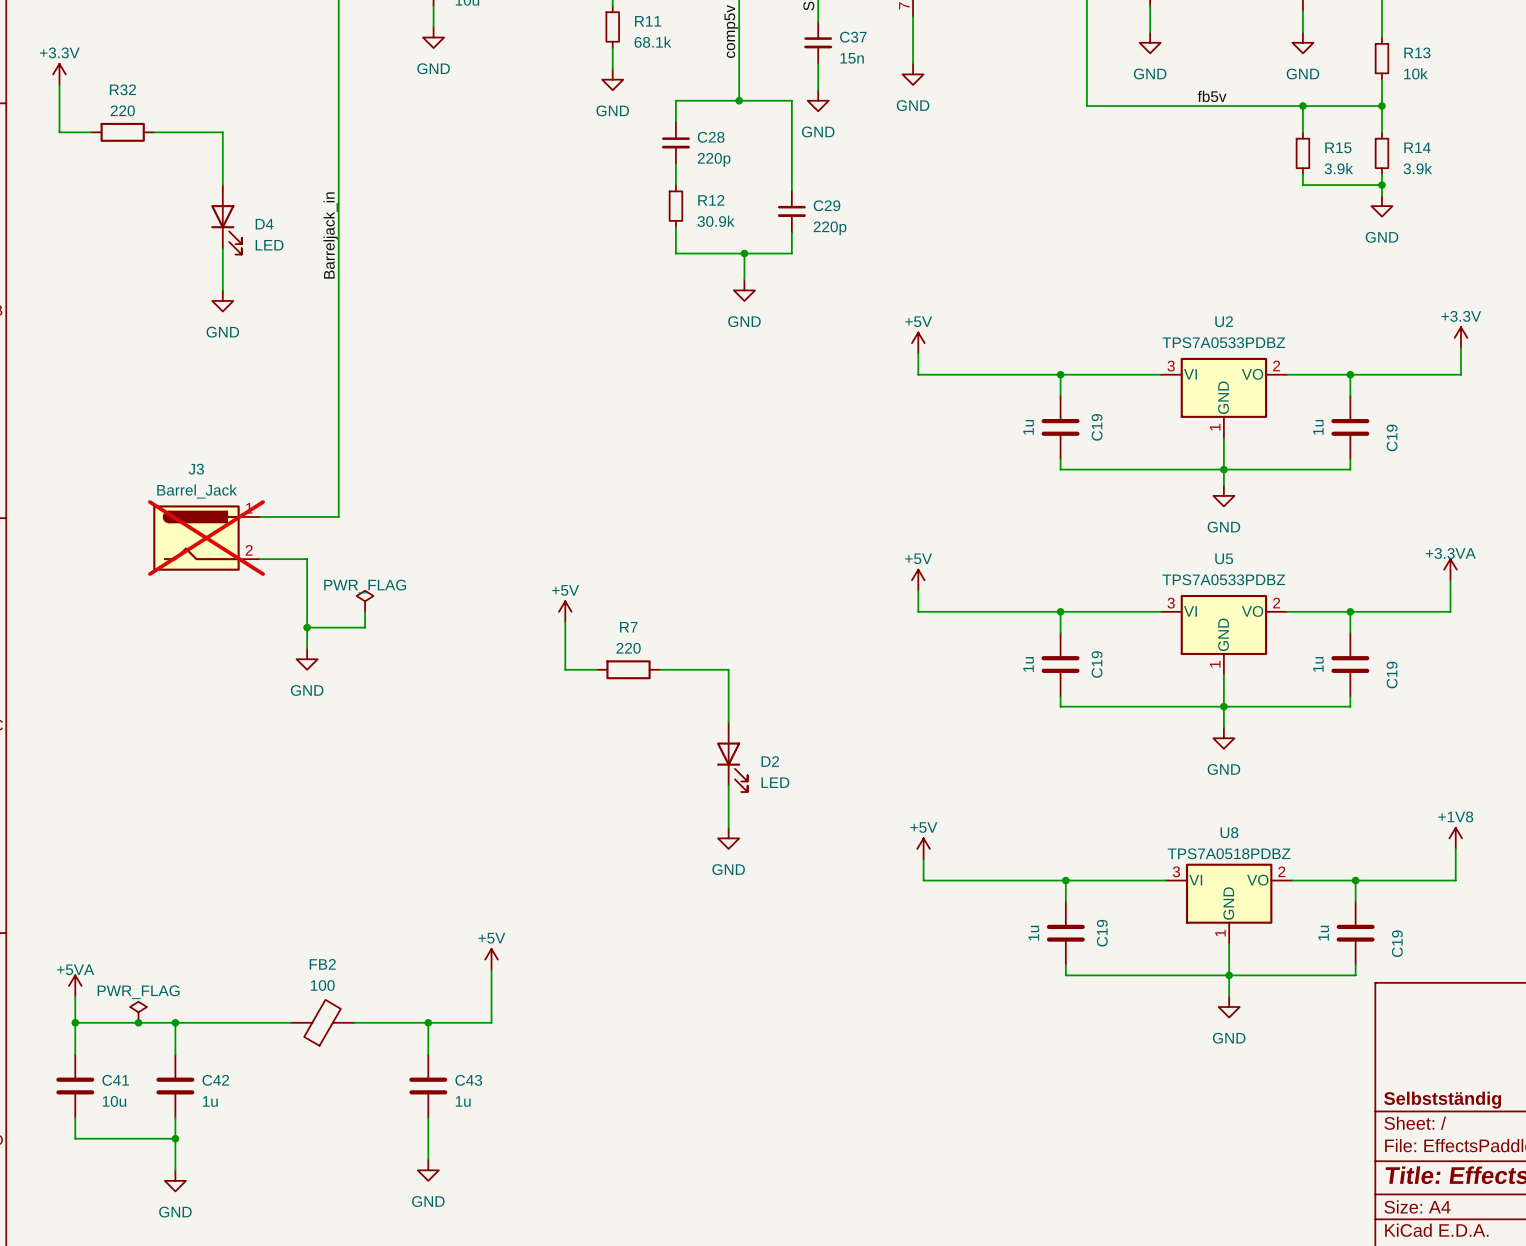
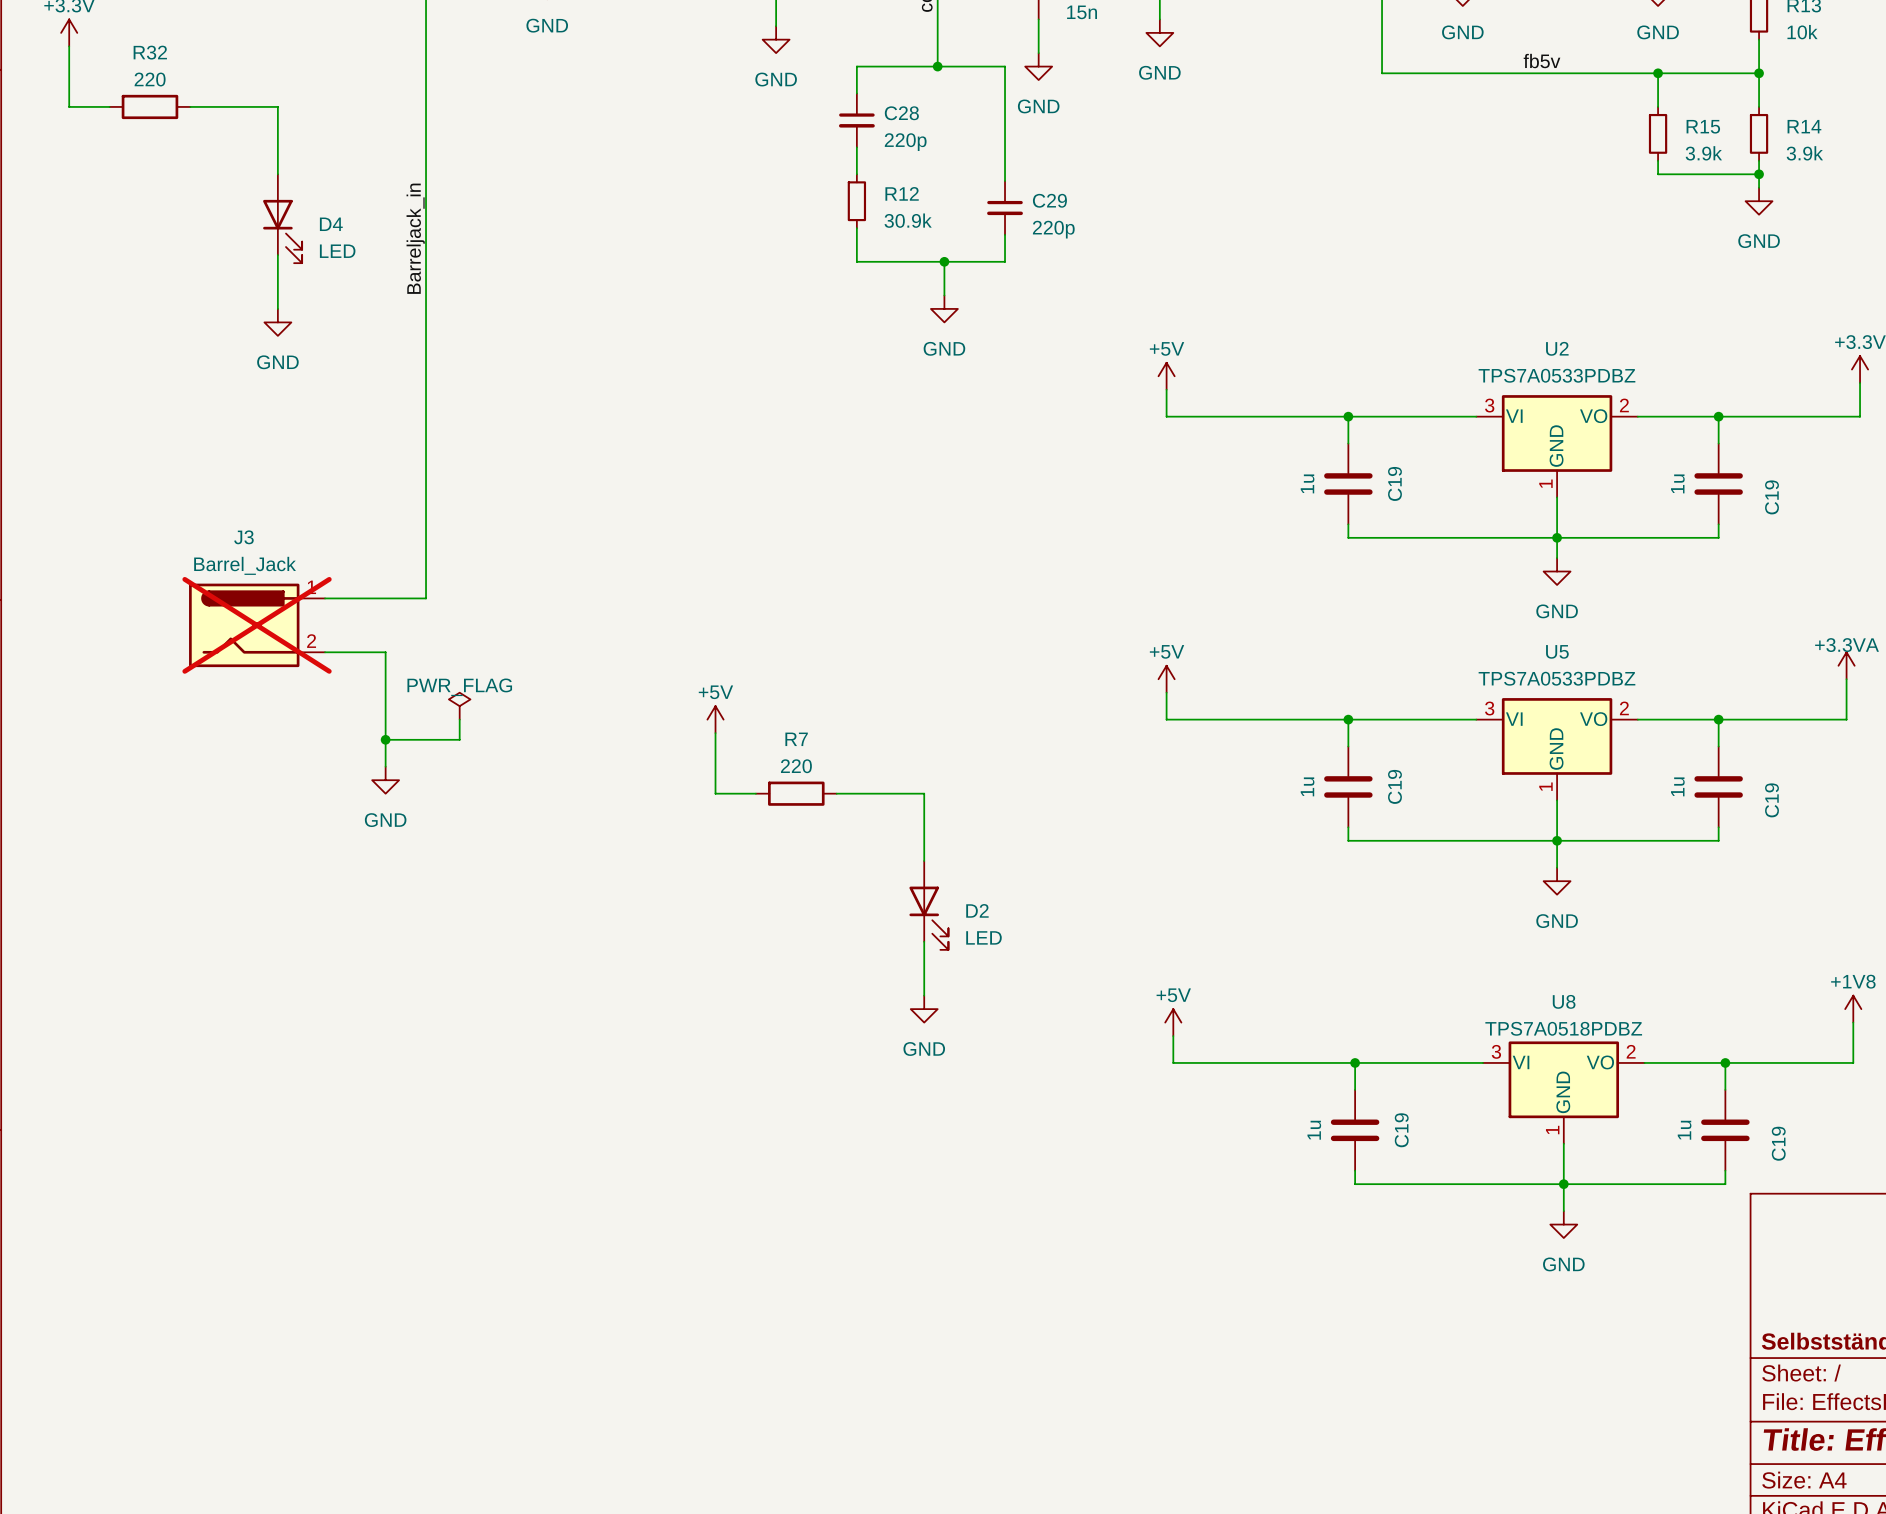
power symbol: +5V (491, 959) -> none
wire: (491, 970) (491, 1022) (354, 1022) -> none
power symbol: +5VA (75, 985) -> none
wire: (75, 996) (75, 1054) -> none
power symbol: PWR_FLAG (138, 1012) -> none
wire: (75, 1022) (291, 1022) -> none
junction: (75, 1022) -> none
junction: (138, 1022) -> none
wire: (175, 1022) (175, 1054) -> none
junction: (175, 1022) -> none
FB2: 100 (322, 1022) -> none
wire: (428, 1022) (428, 1054) -> none
junction: (428, 1022) -> none
C41: 10u (75, 1086) -> none
C42: 1u (175, 1086) -> none
C43: 1u (428, 1086) -> none
wire: (75, 1117) (75, 1138) (175, 1138) -> none
wire: (175, 1117) (175, 1170) -> none
wire: (428, 1117) (428, 1159) -> none
junction: (175, 1138) -> none
power symbol: GND (428, 1170) -> none
power symbol: GND (175, 1180) -> none

